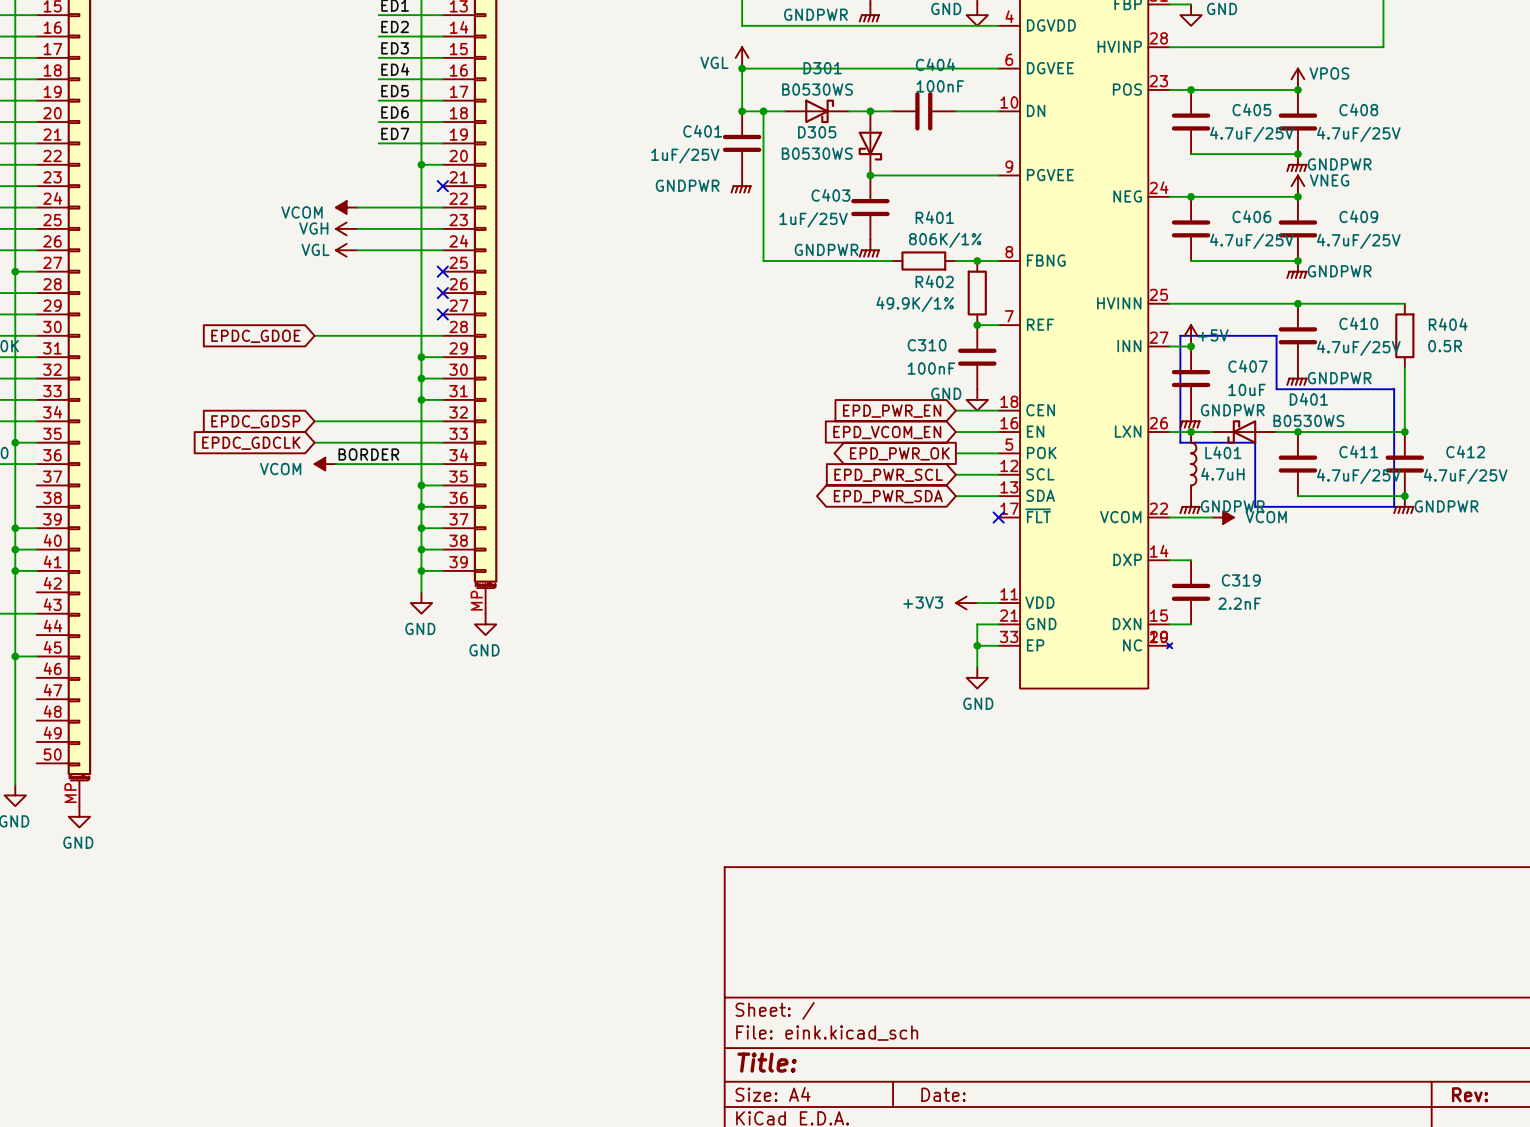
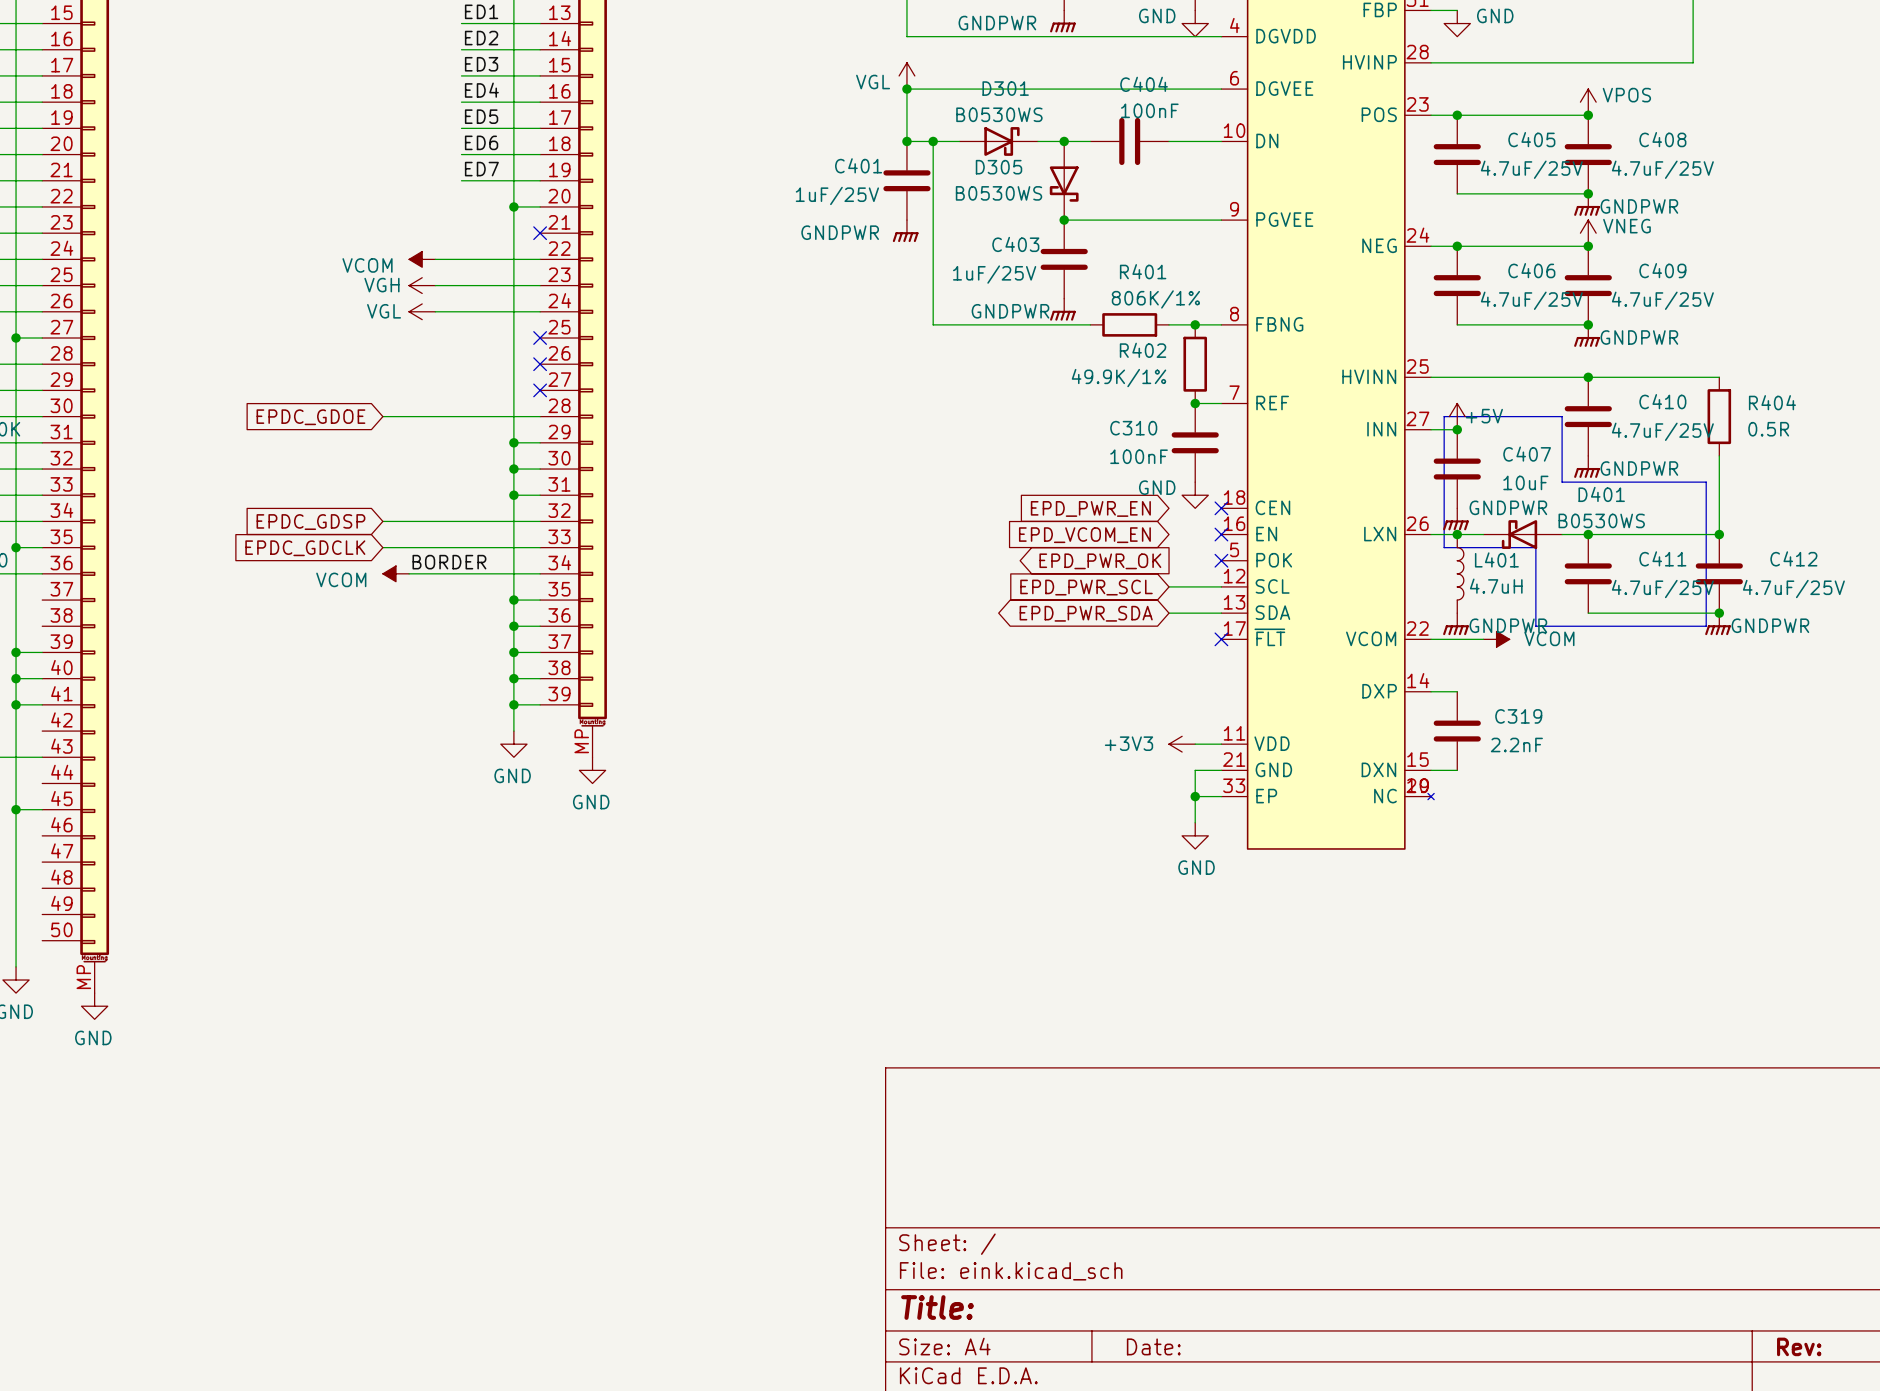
wire: (955, 410) (998, 410) -> none
no-connect mark: none -> (1221, 508)
wire: (955, 432) (998, 432) -> none
no-connect mark: none -> (1221, 534)
wire: (955, 453) (998, 453) -> none
no-connect mark: none -> (1221, 560)

